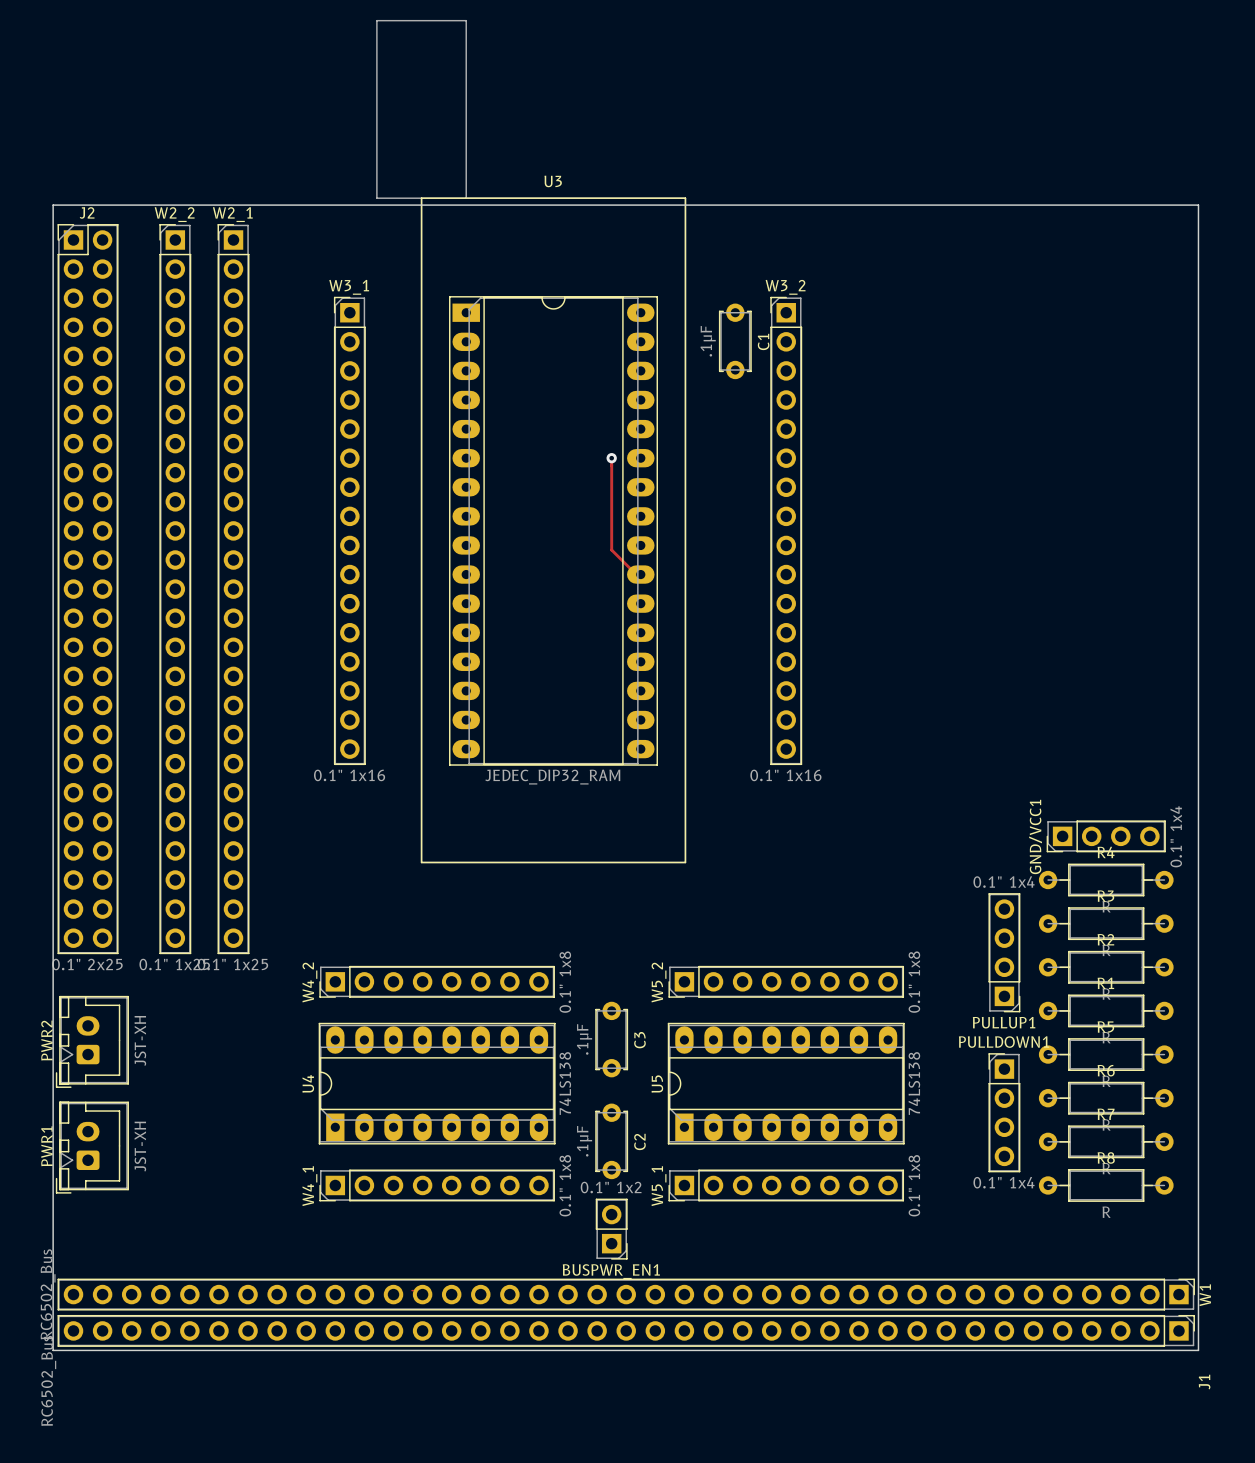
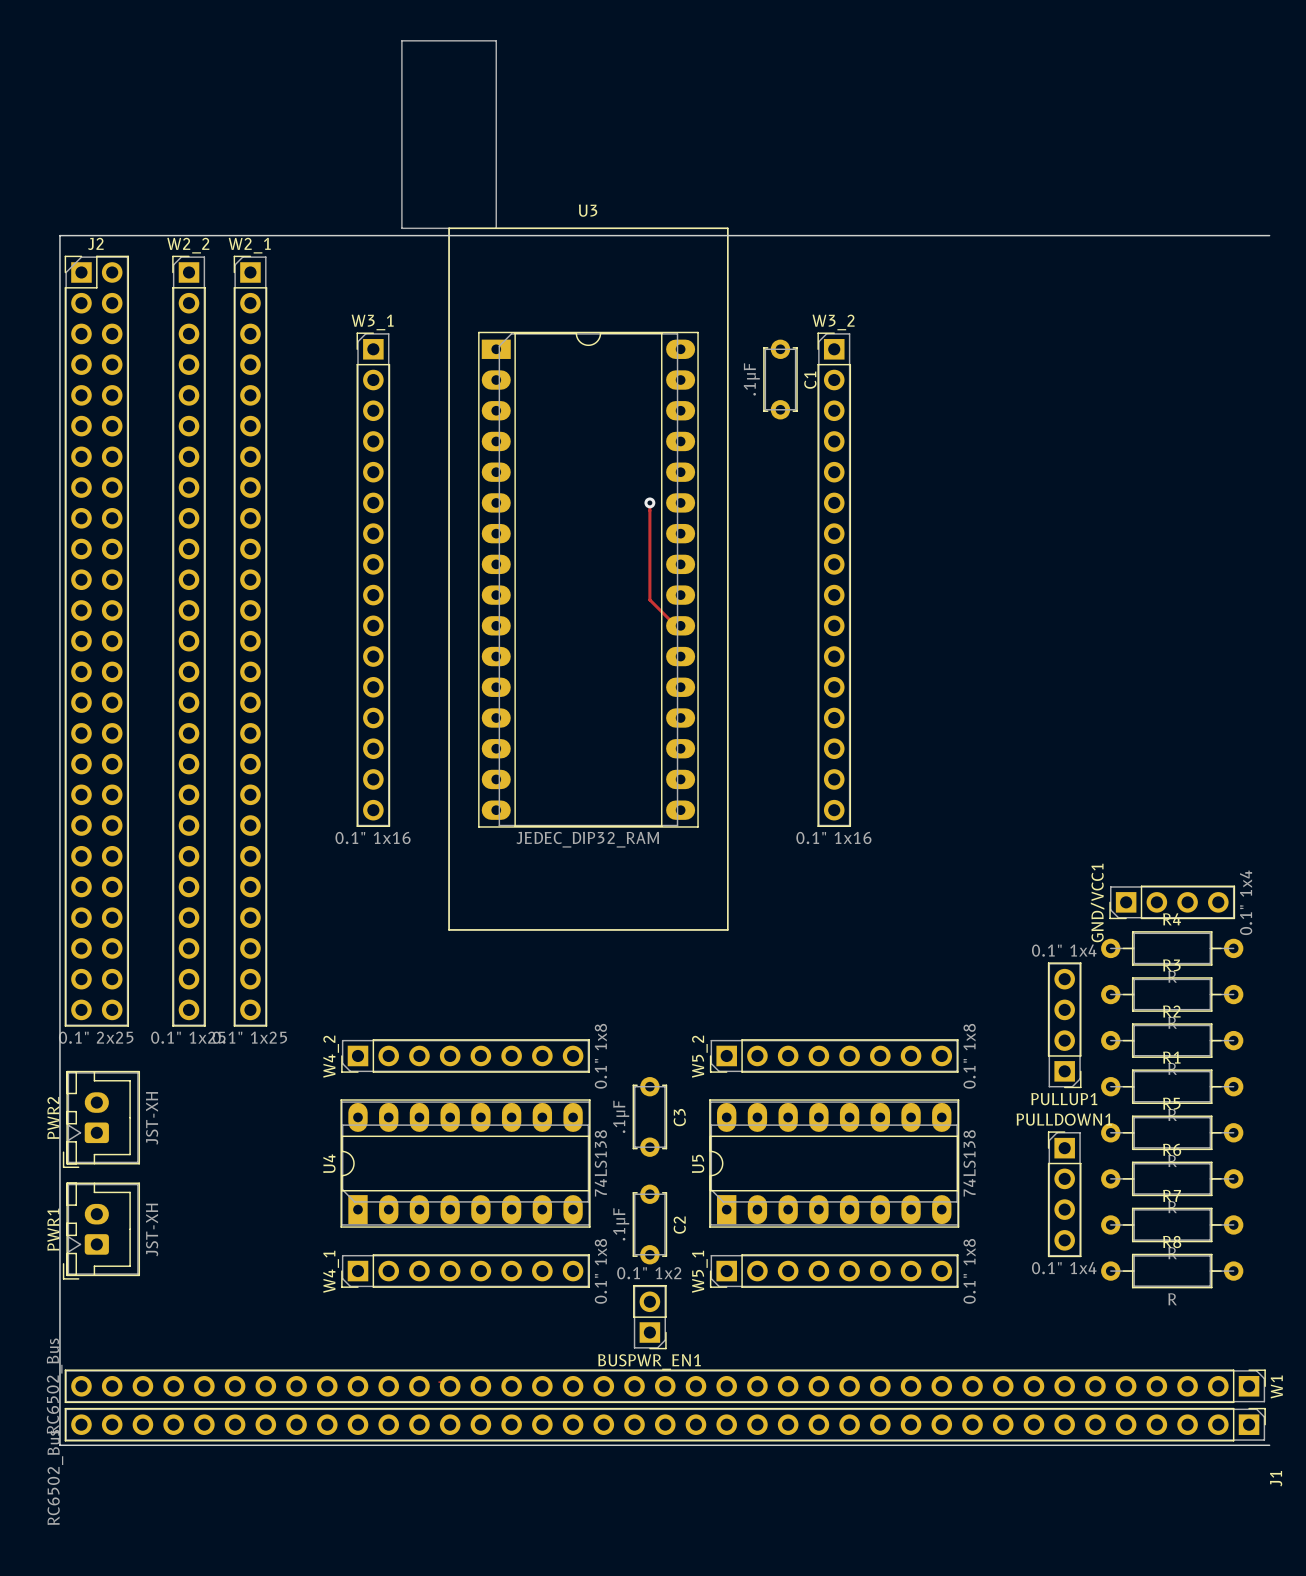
board edge: (1198, 205) (1198, 1350) -> none

